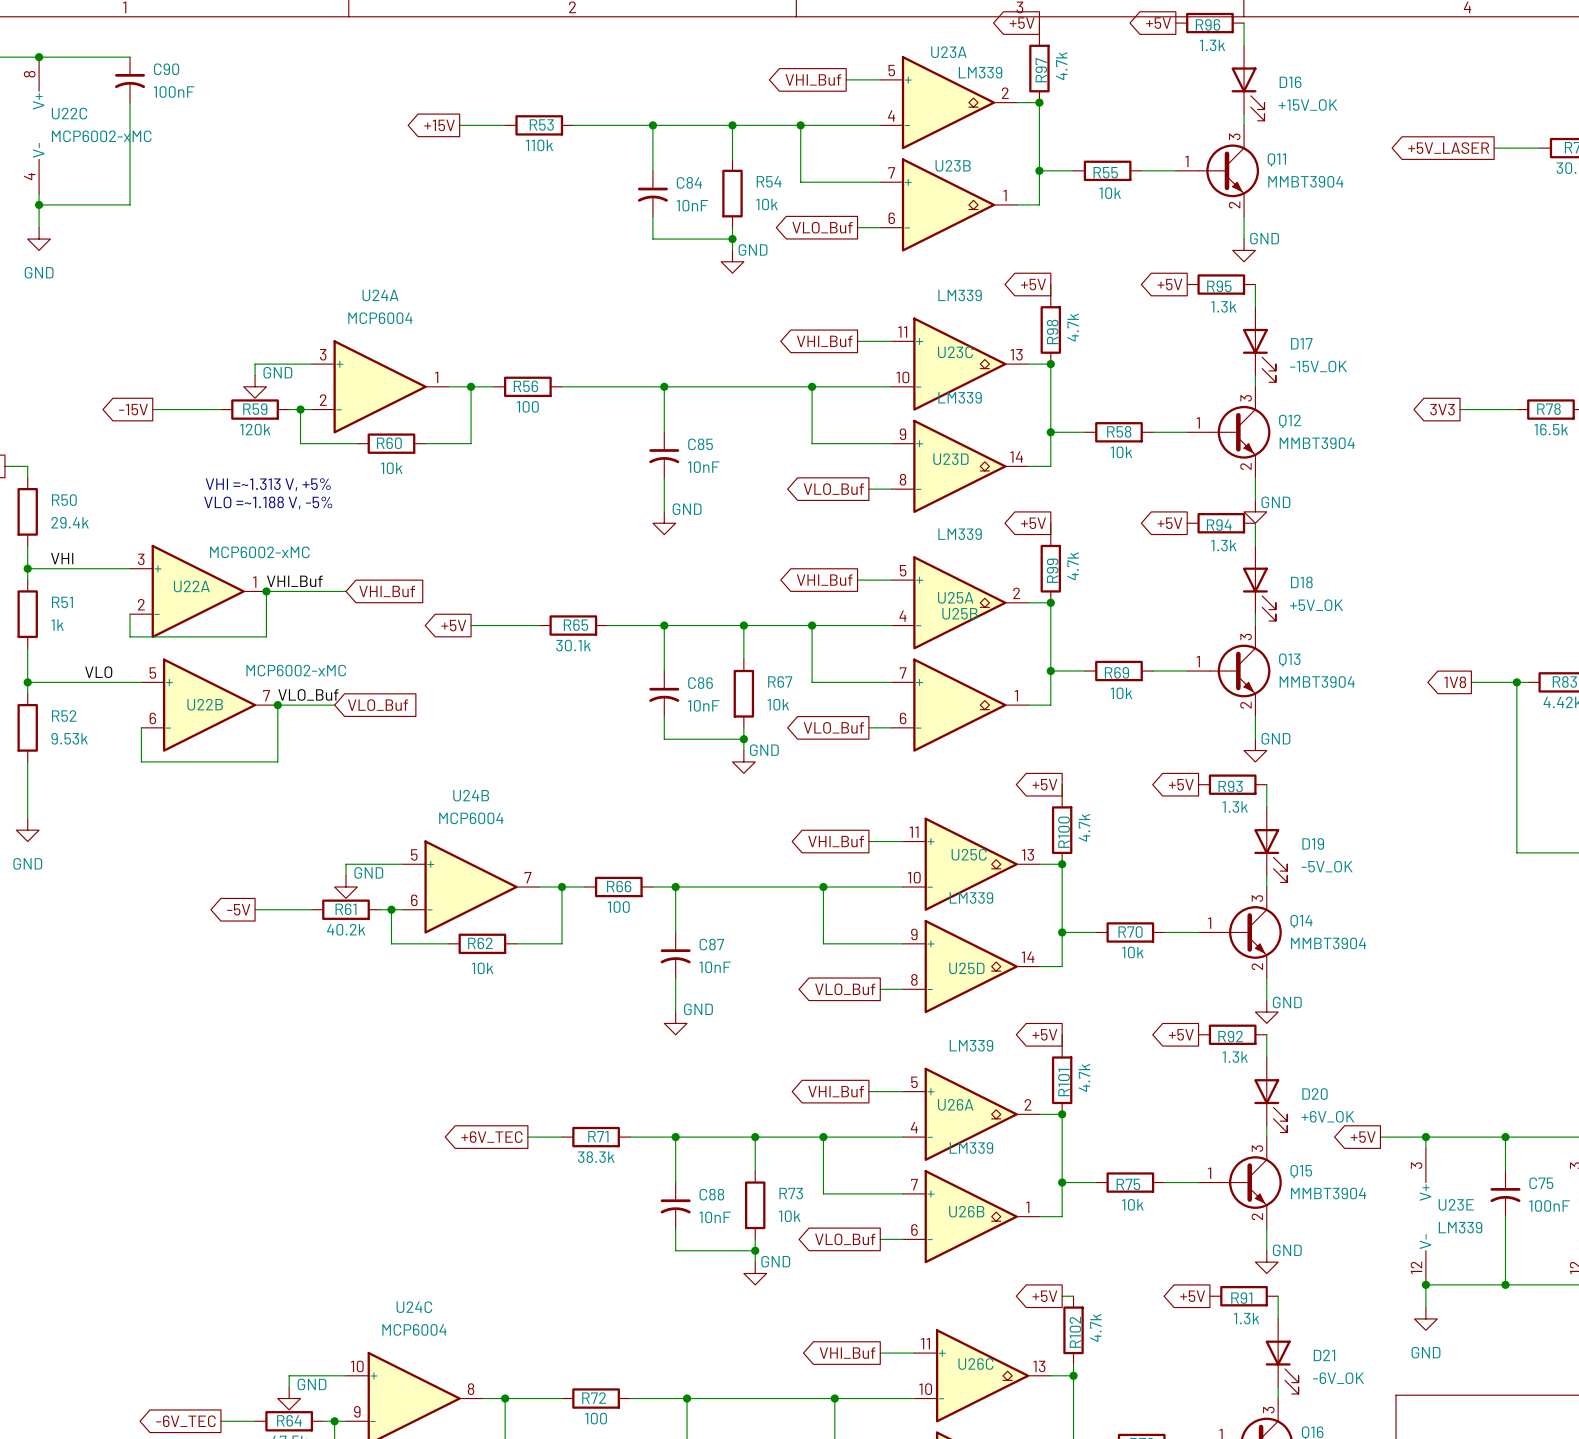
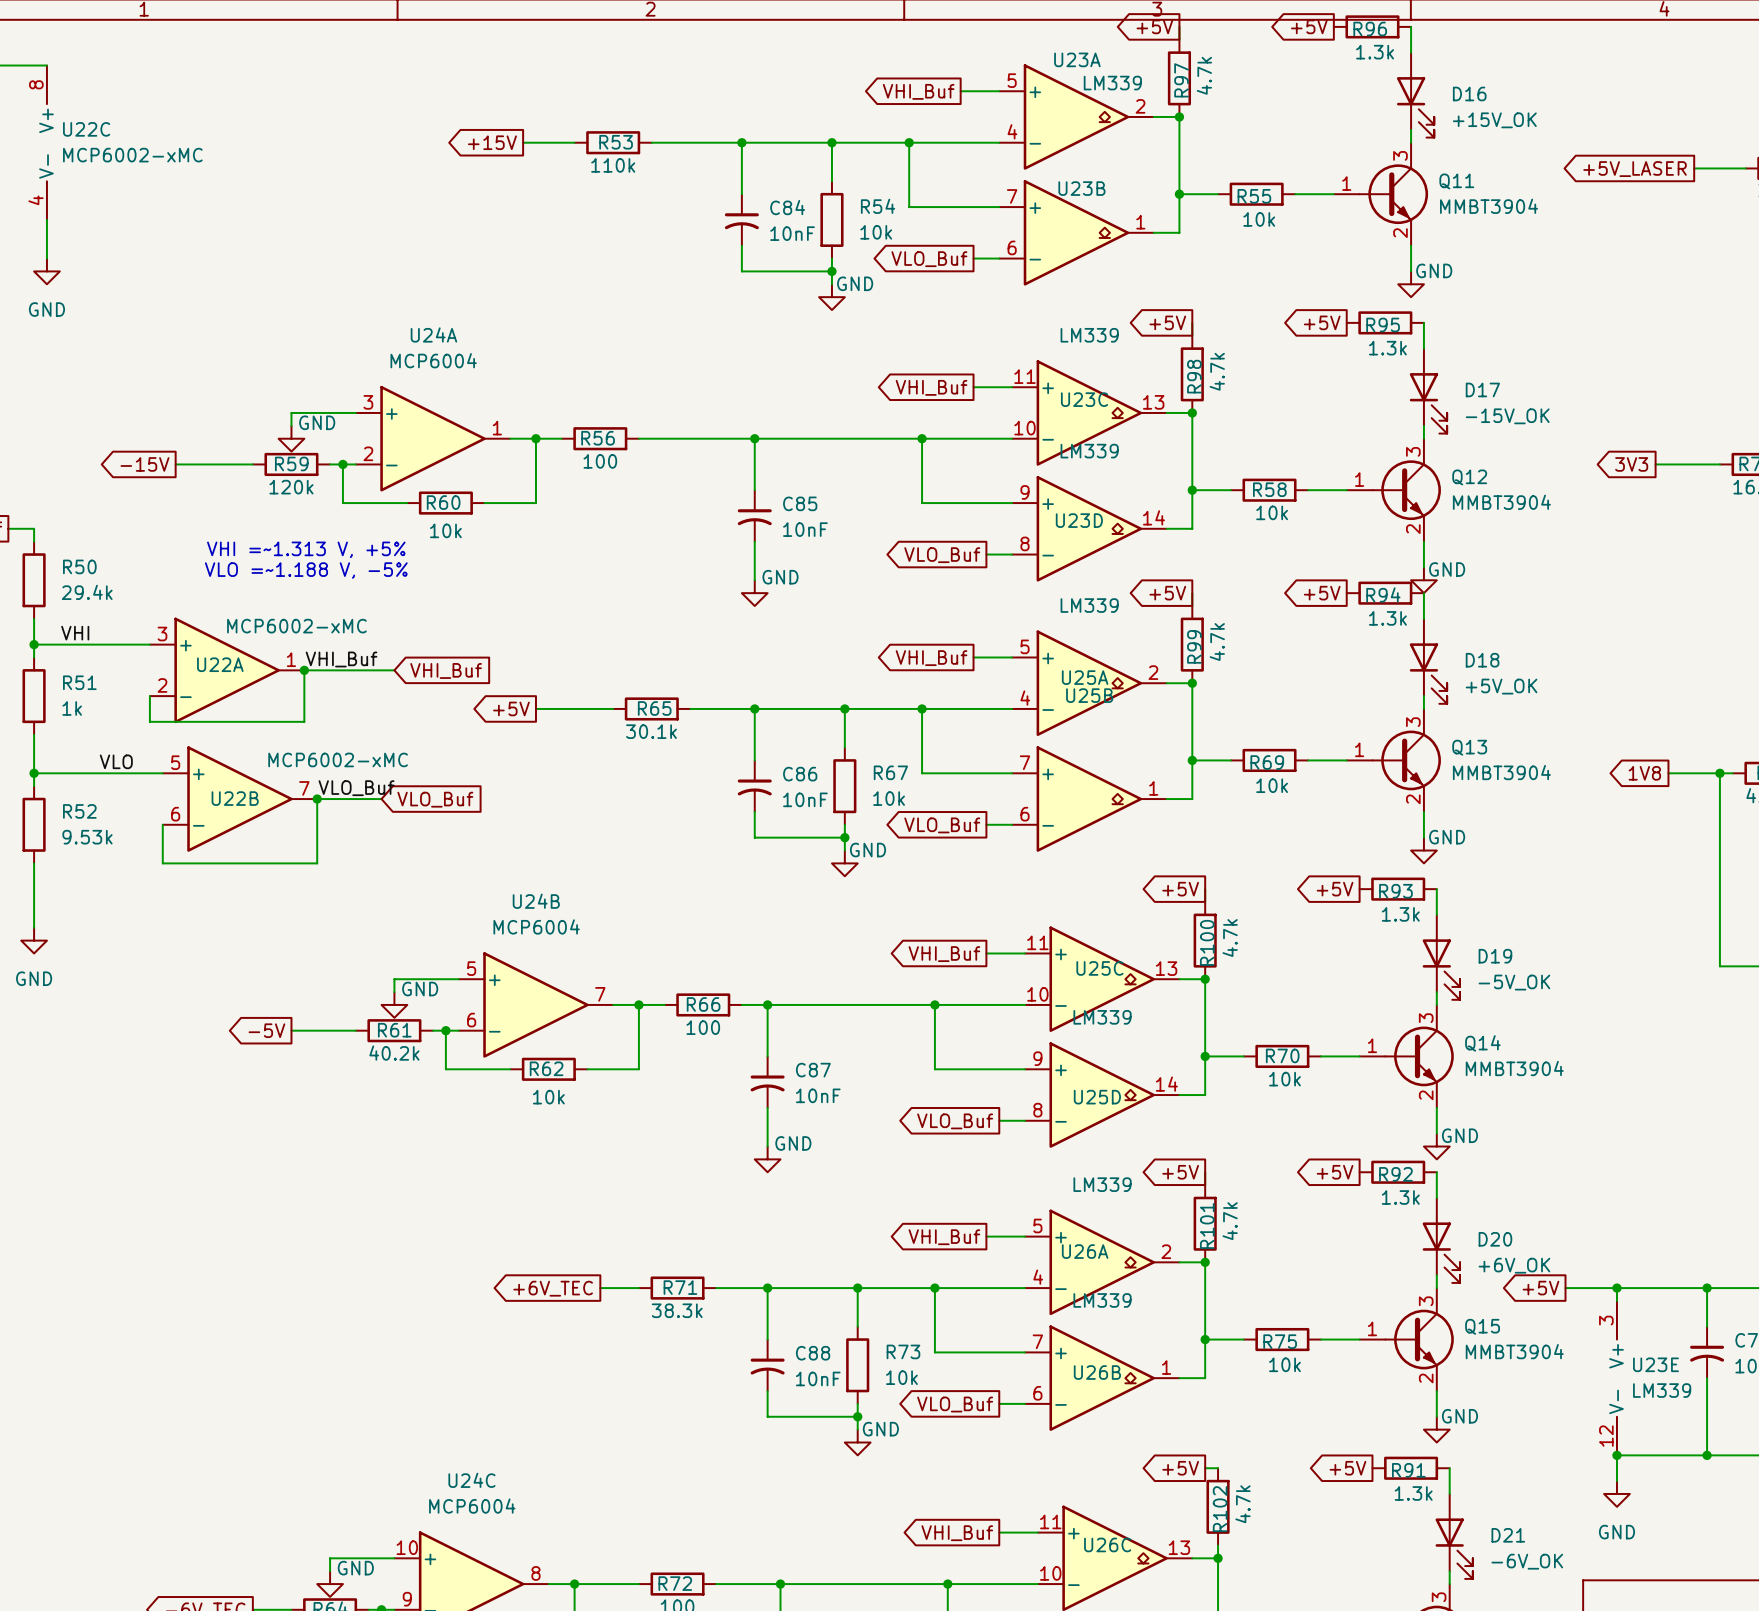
wire: (39, 57) (130, 57) -> none
junction: (39, 57) -> none
C90: 100nF (130, 79) -> none
wire: (130, 102) (130, 204) (39, 204) -> none
junction: (39, 204) -> none

